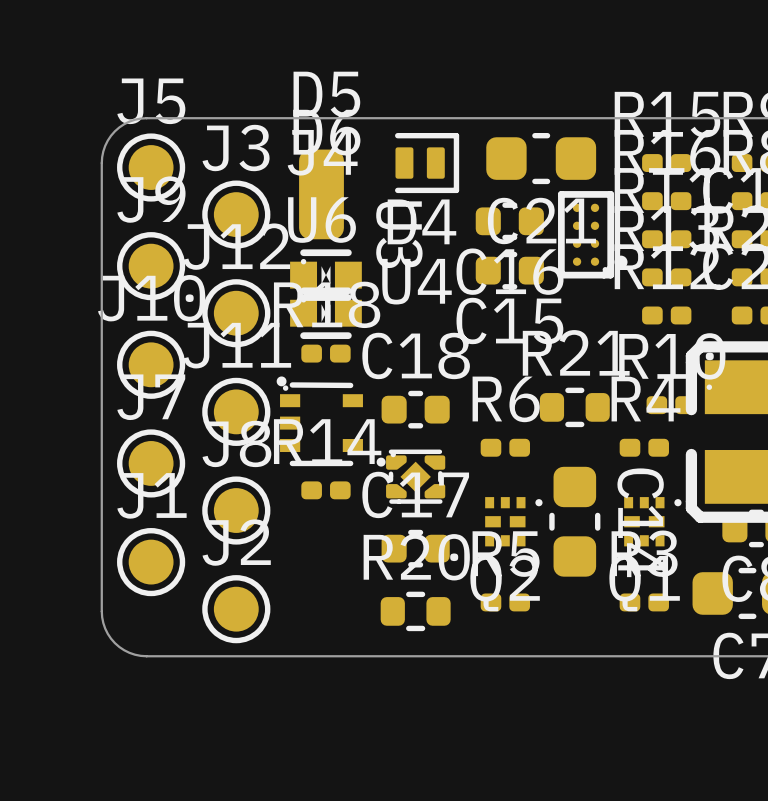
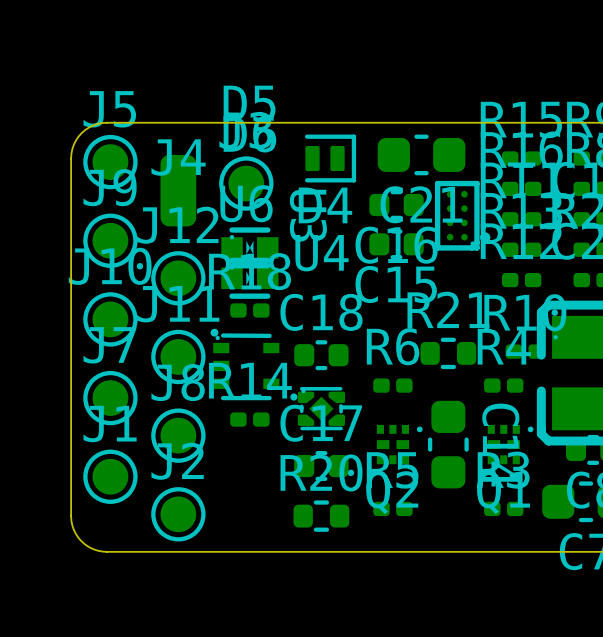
J4 position: (321, 194) -> (178, 190)
J3 position: (236, 214) -> (246, 183)

